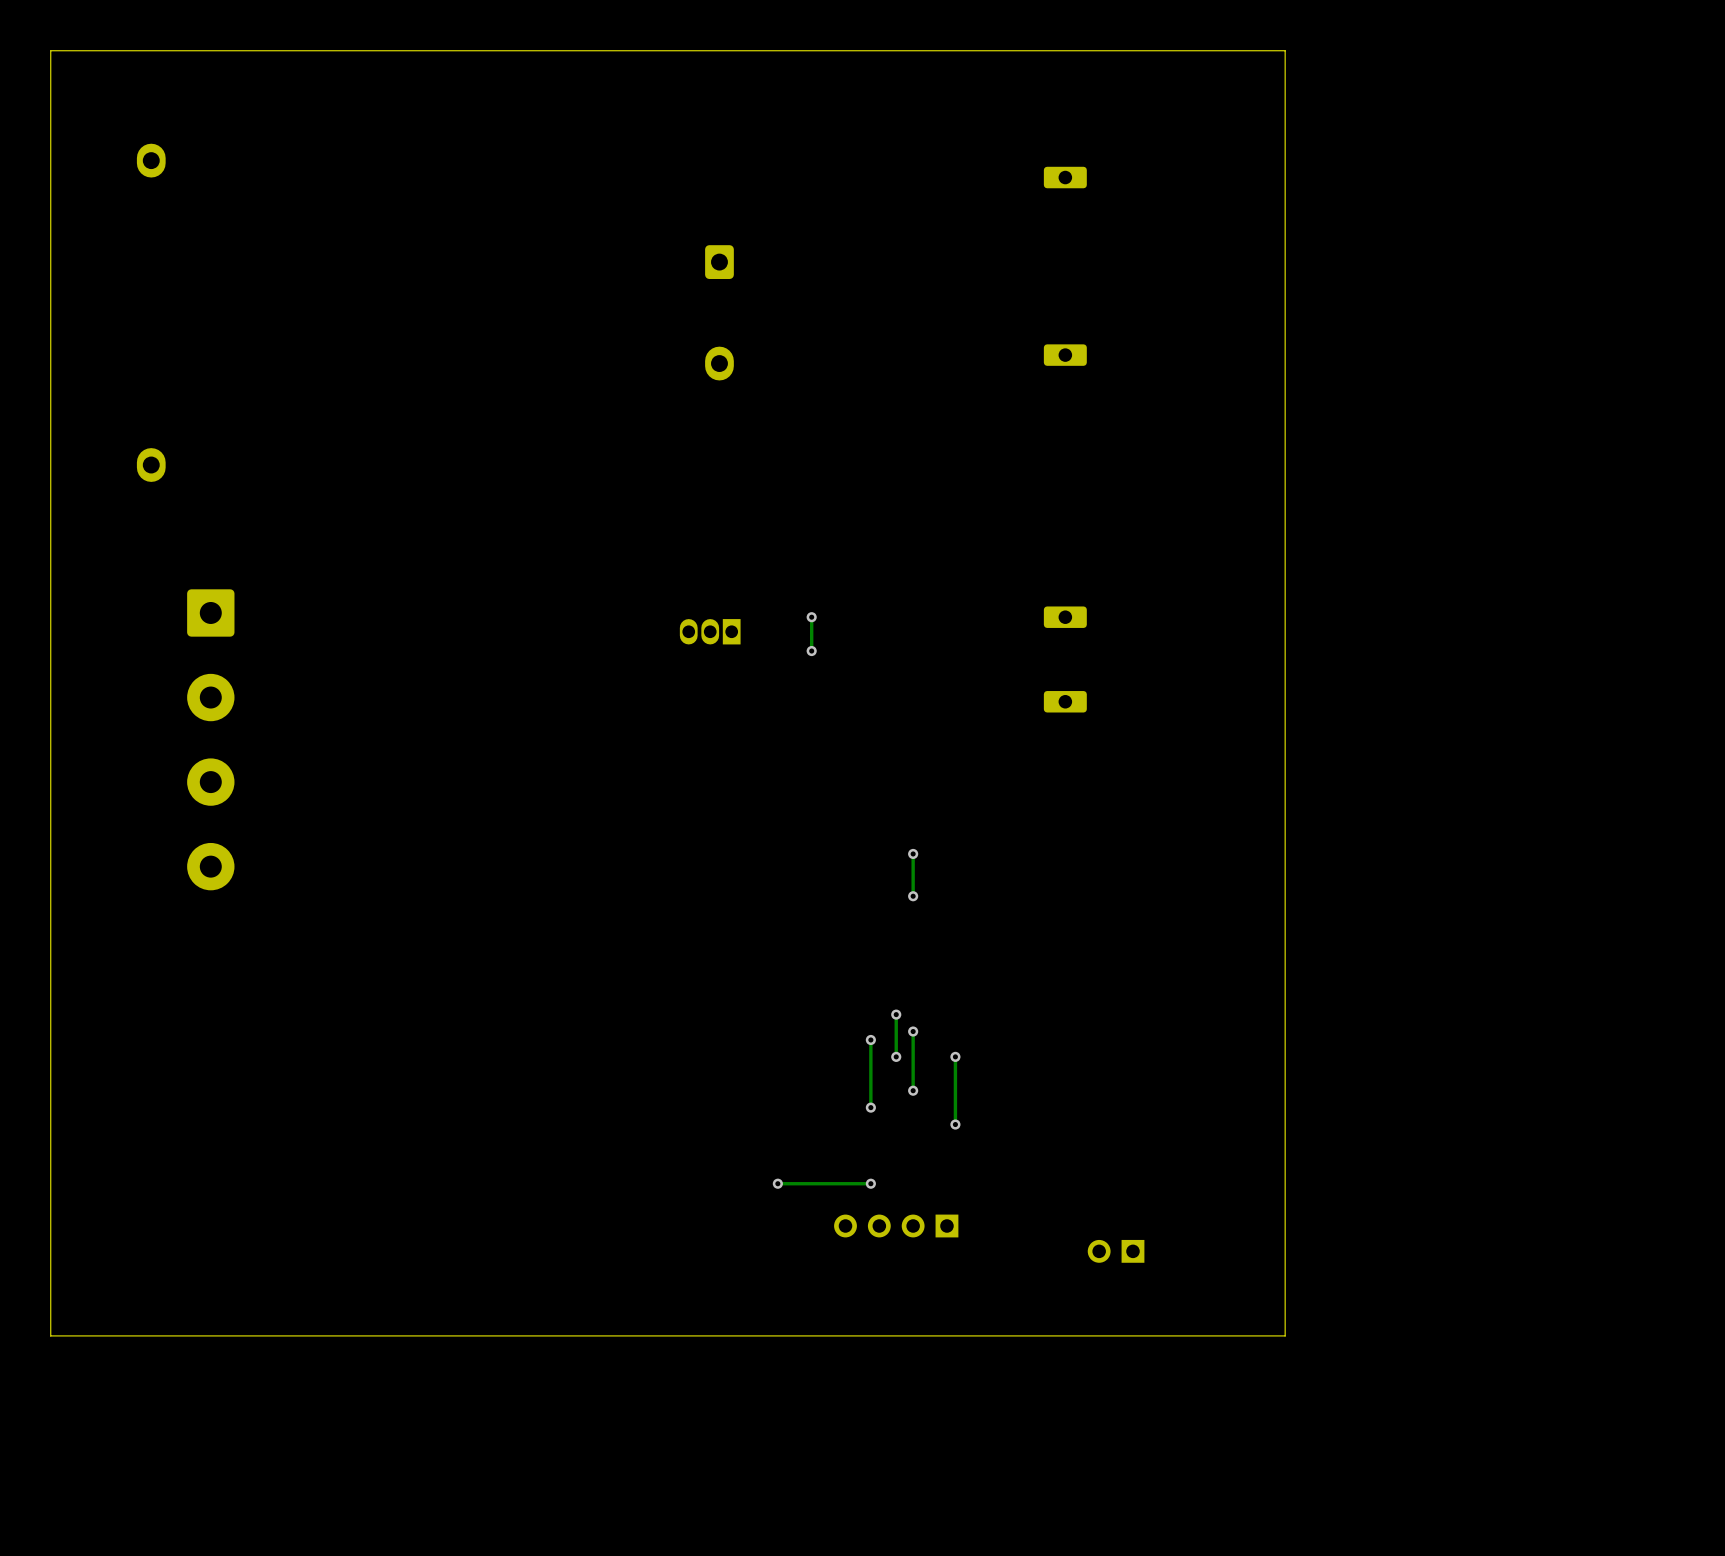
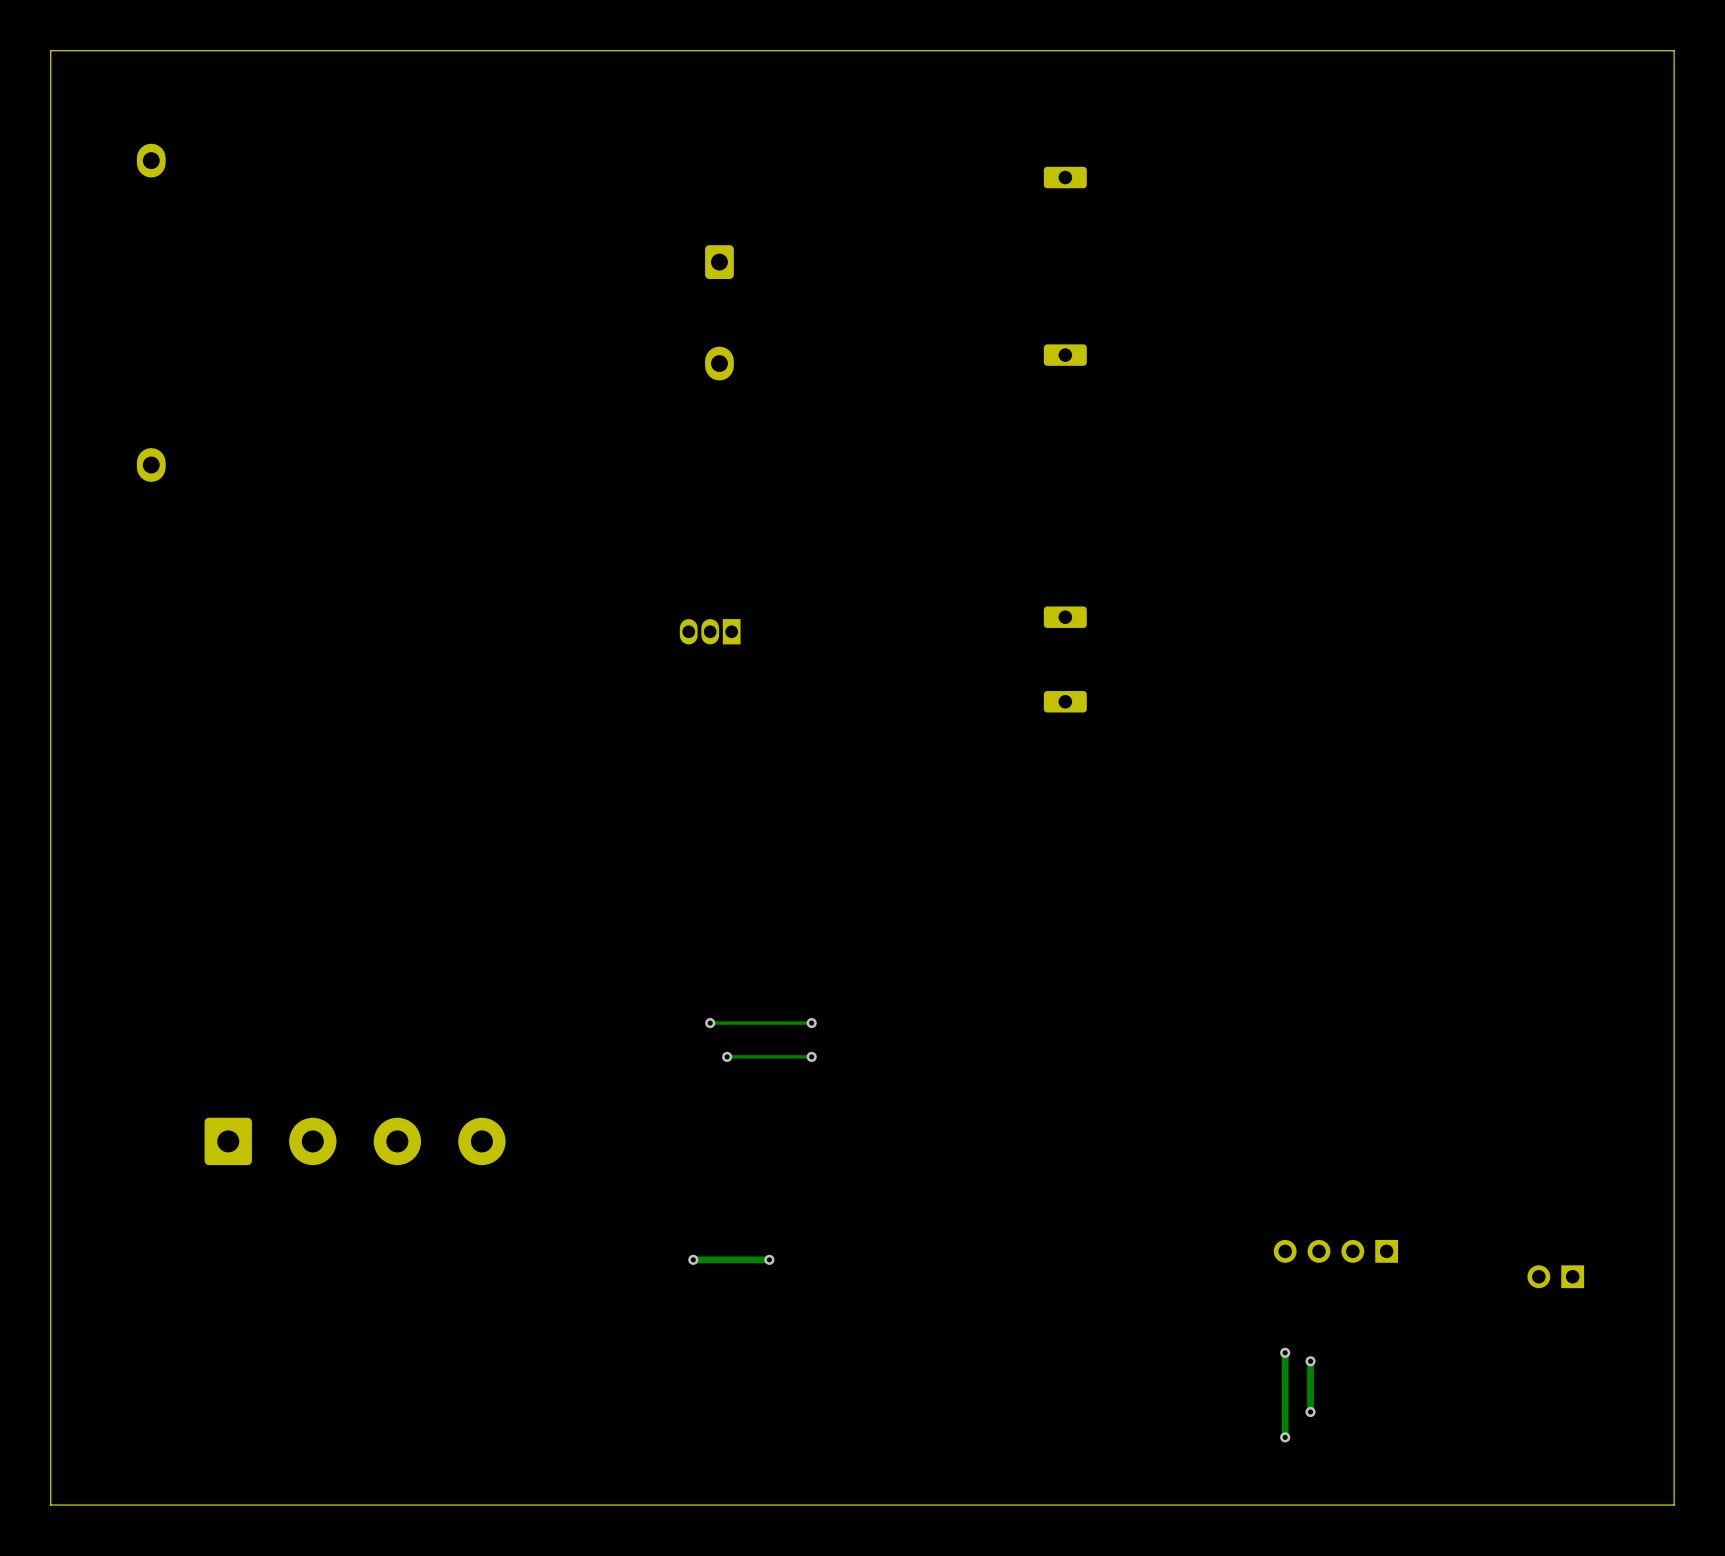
board edge: (1285, 50) (1285, 1335) (50, 1335) -> (1285, 50) (1674, 50) (1674, 1505) (50, 1505) (50, 1335)
track: (811, 617) (811, 651) -> none
via: (811, 617) -> none
via: (811, 651) -> none
part: (210, 739) -> none
track: (913, 853) (913, 896) -> none
via: (913, 853) -> none
via: (913, 896) -> none
track: (896, 1014) (896, 1056) -> none
via: (896, 1014) -> none
via: none -> (710, 1023)
track: none -> (811, 1023) (710, 1023)
via: none -> (811, 1023)
track: (913, 1031) (913, 1090) -> none
via: (913, 1031) -> none
track: (870, 1039) (870, 1107) -> none
via: (870, 1039) -> none
via: none -> (727, 1056)
track: none -> (811, 1056) (727, 1056)
via: none -> (811, 1056)
via: (896, 1056) -> none
track: (955, 1056) (955, 1124) -> none
via: (955, 1056) -> none
via: (913, 1090) -> none
via: (870, 1107) -> none
via: (955, 1124) -> none
part: none -> (355, 1141)
via: (777, 1183) -> none
track: (870, 1183) (777, 1183) -> none
via: (870, 1183) -> none
part: (896, 1226) -> none
part: (1116, 1251) -> none
part: none -> (1335, 1251)
via: none -> (693, 1259)
track: none -> (769, 1259) (693, 1259)
via: none -> (769, 1259)
part: none -> (1555, 1276)
track: none -> (1285, 1352) (1285, 1437)
via: none -> (1285, 1352)
track: none -> (1310, 1361) (1310, 1412)
via: none -> (1310, 1361)
via: none -> (1310, 1412)
via: none -> (1285, 1437)

